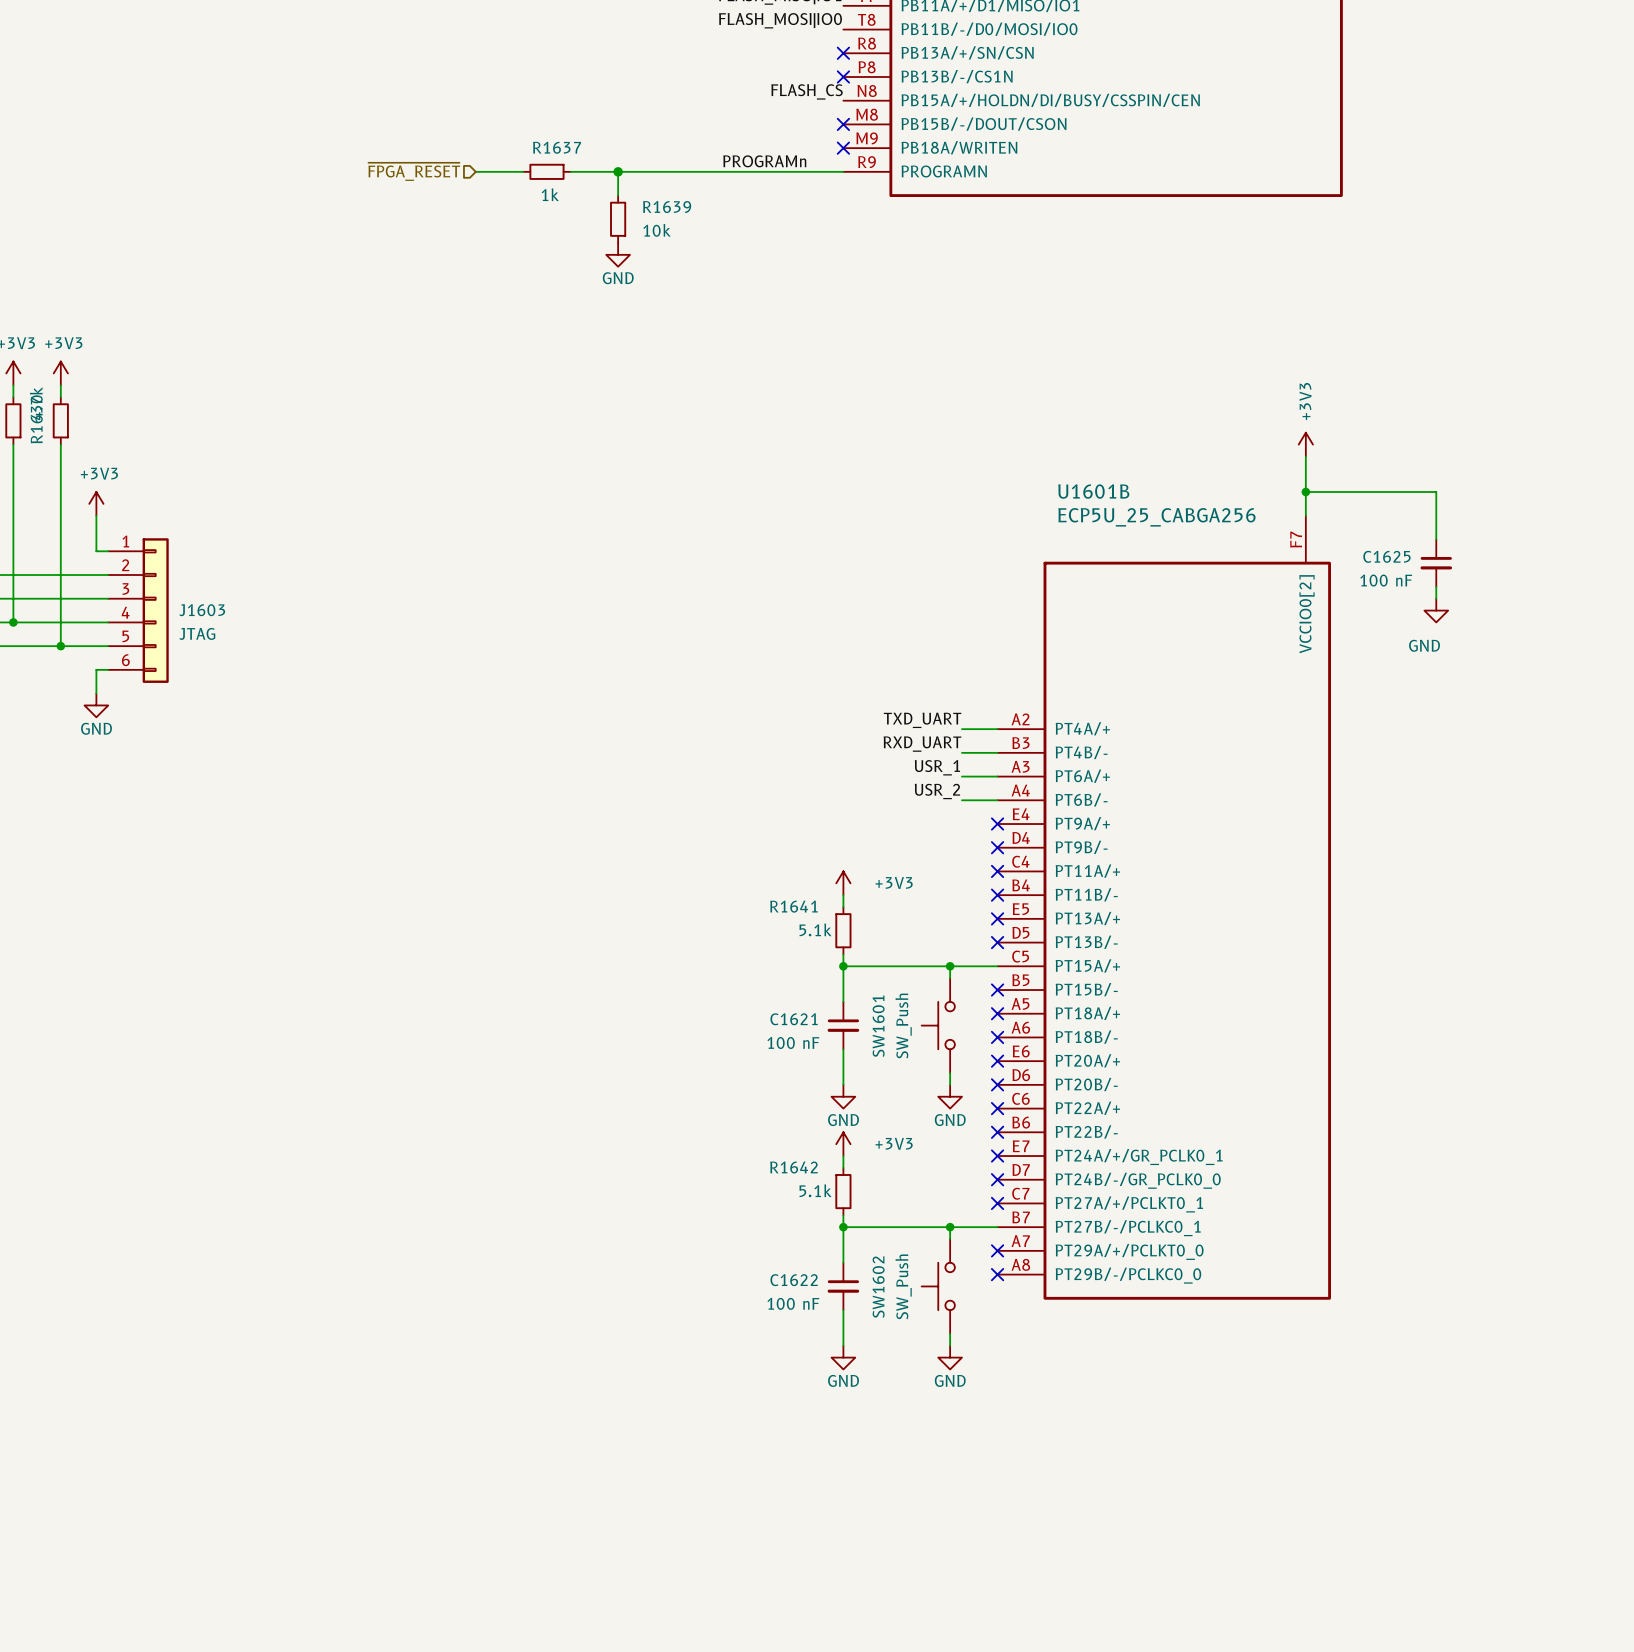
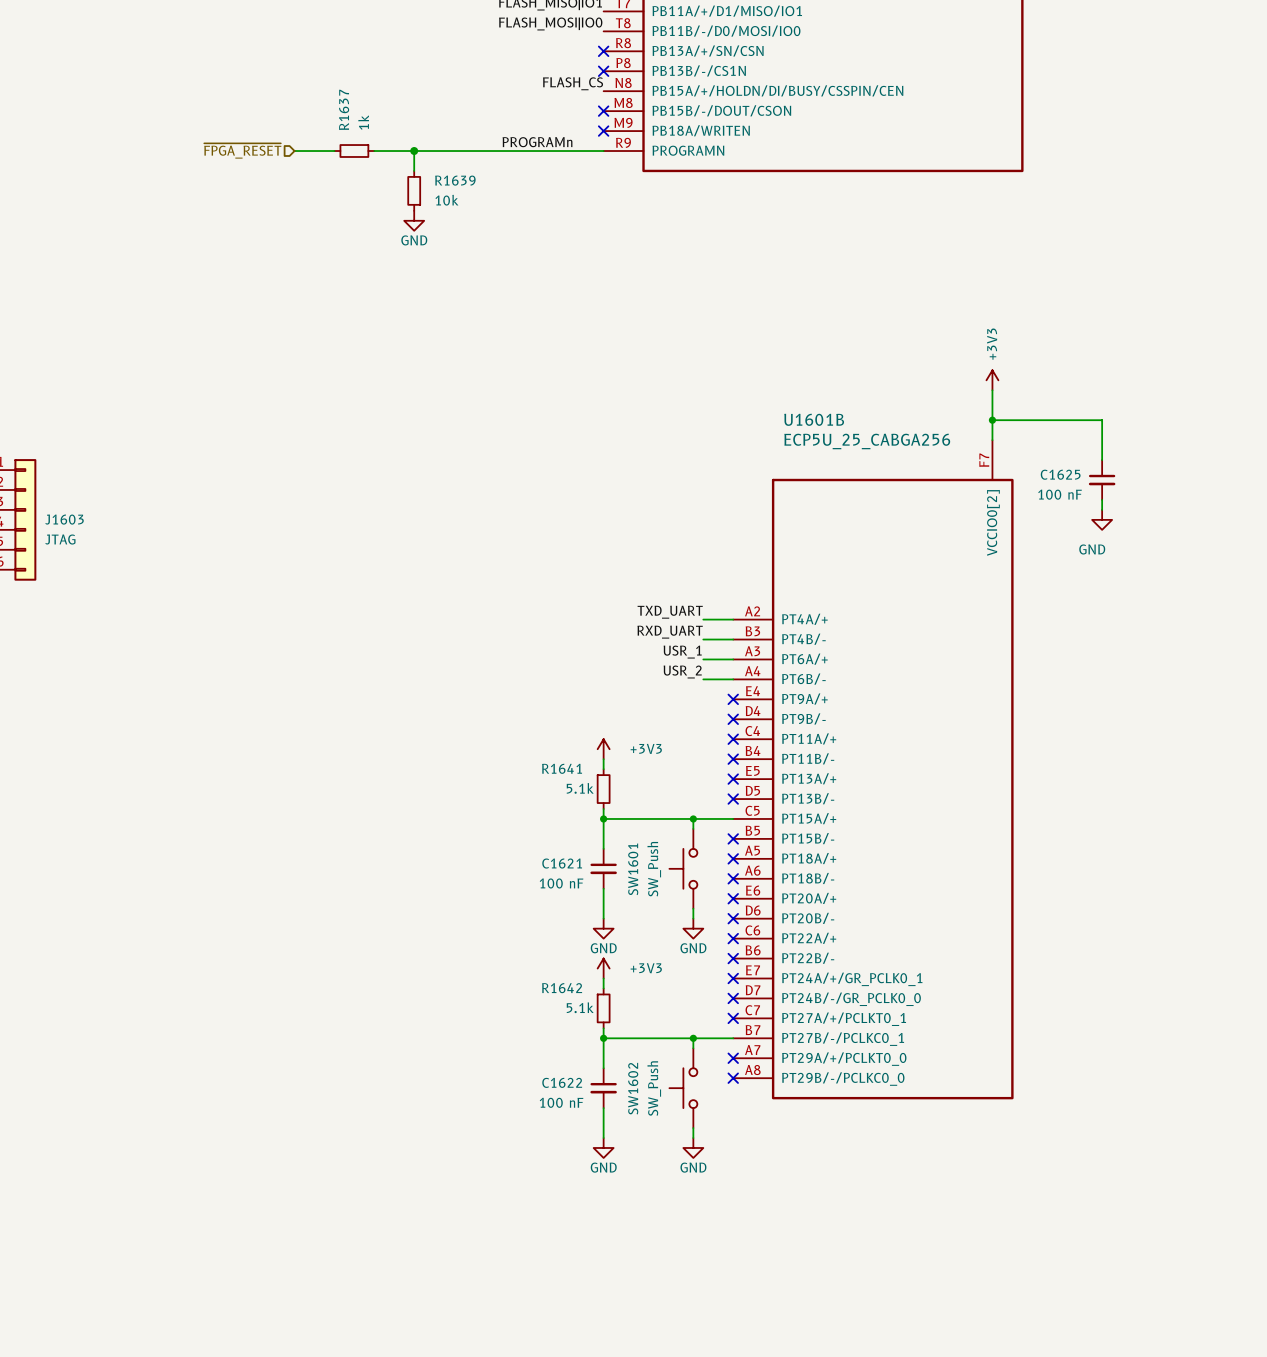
R1637 name rotation: 0° (557, 147) -> 90° counterclockwise (344, 109)
R1637 value rotation: 0° (550, 194) -> 90° counterclockwise (363, 122)
R1637 value position: 1k (550, 194) -> 1k (363, 122)

